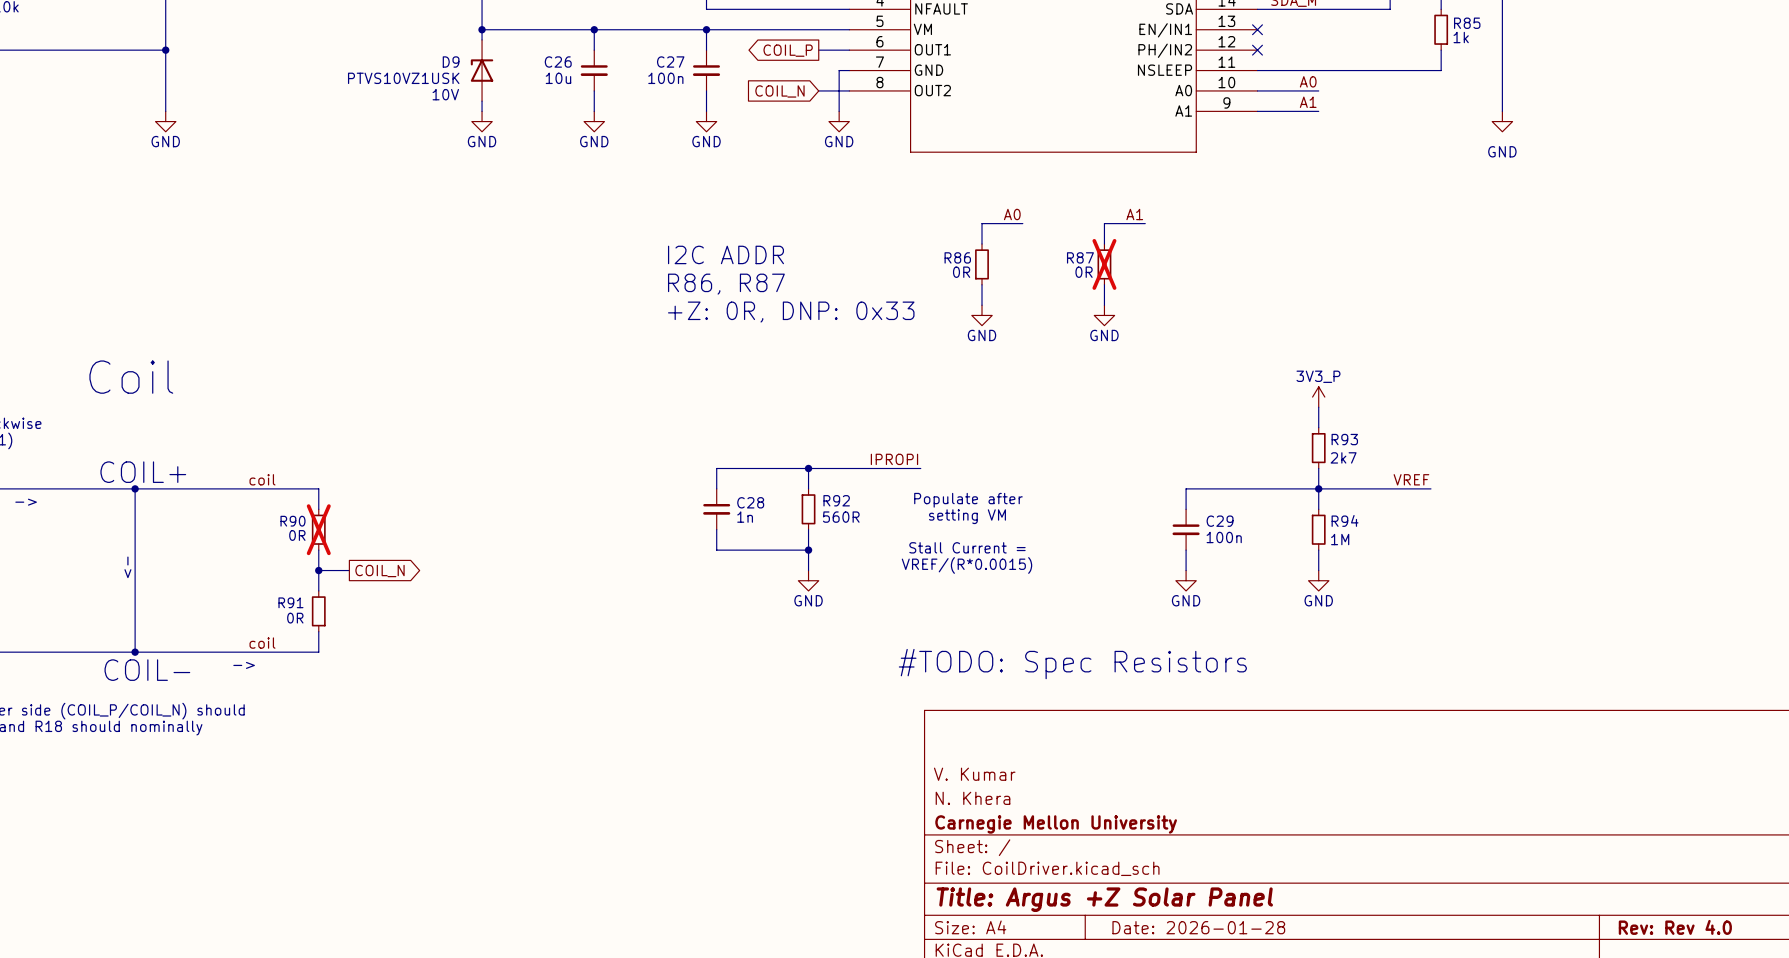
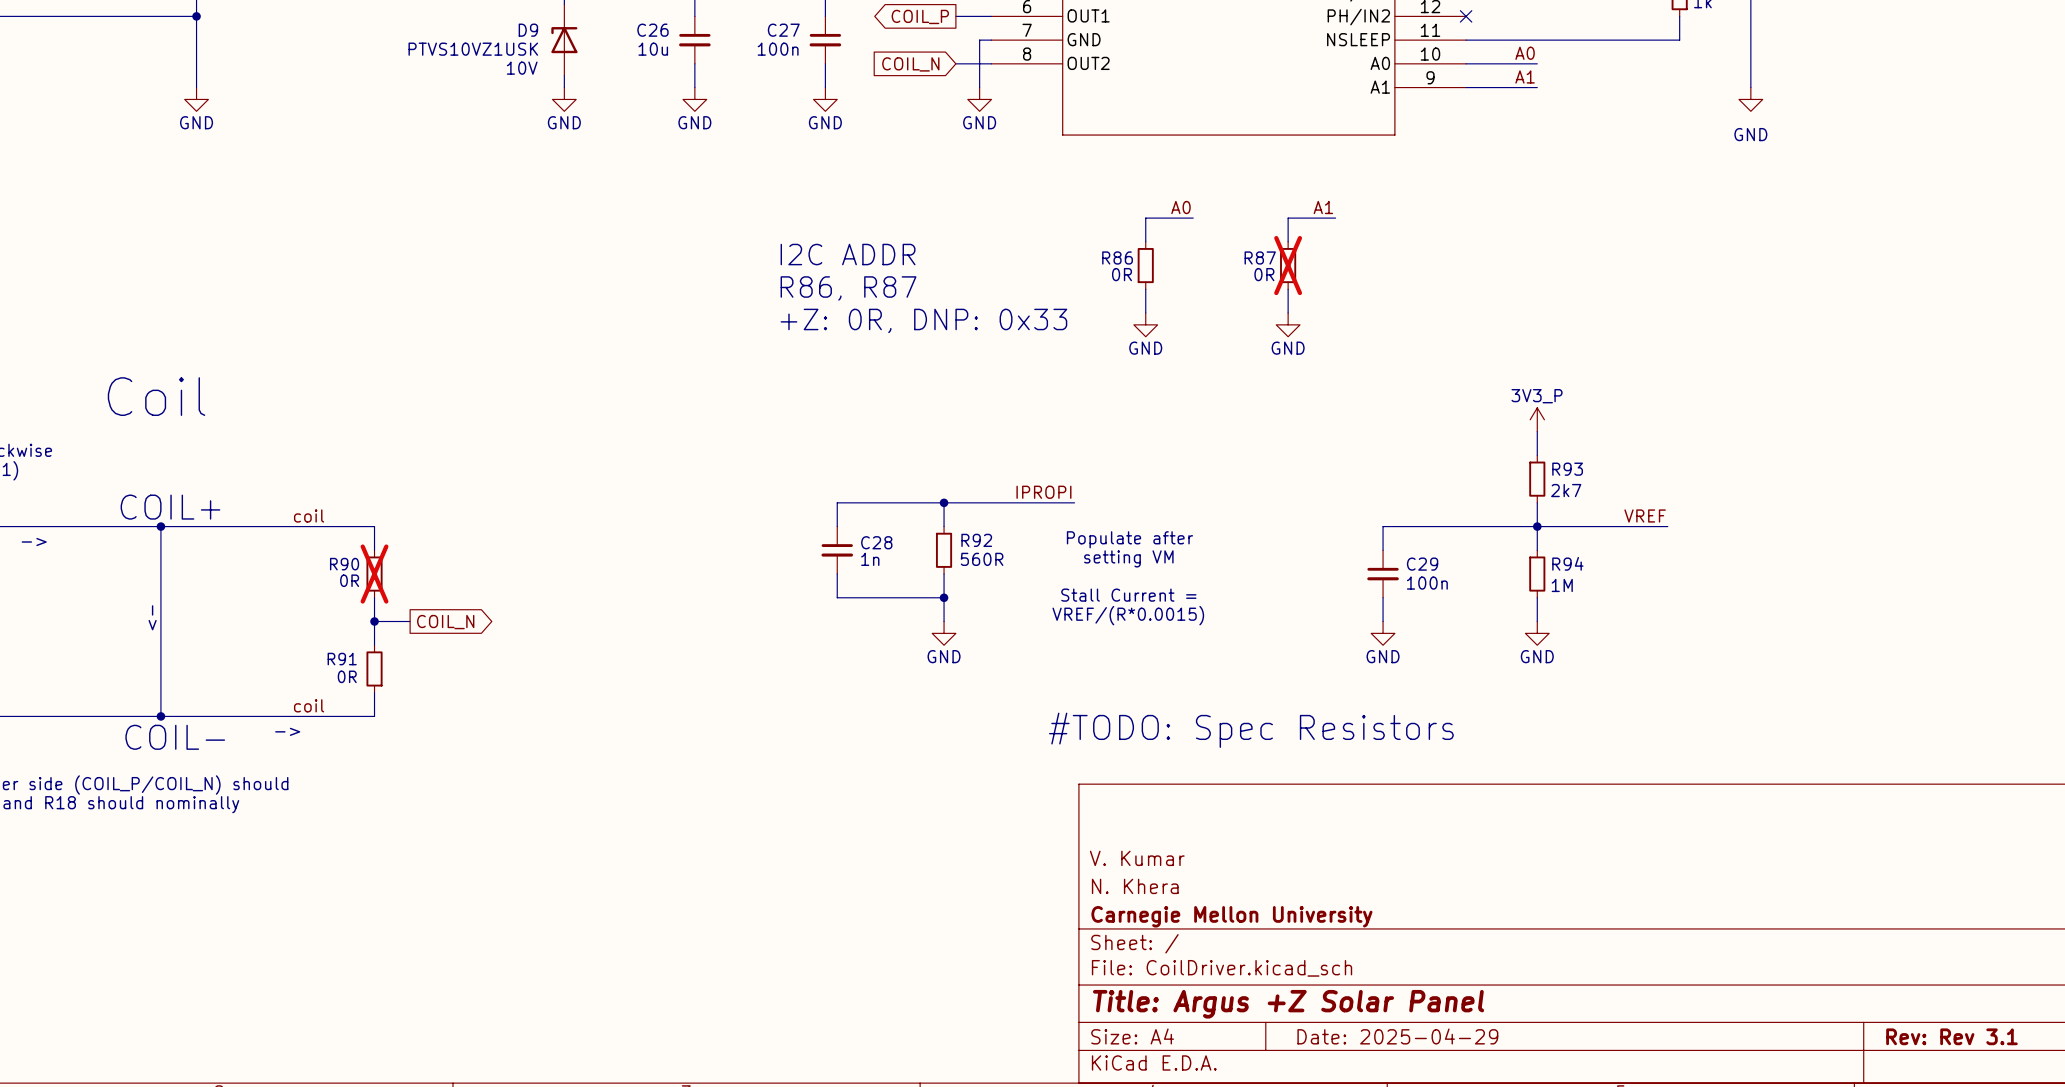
title block: Date: 2026-01-28 (1198, 927) -> Date: 2025-04-29 (1397, 1036)
title block: Rev: Rev 4.0 (1675, 927) -> Rev: Rev 3.1 (1951, 1036)

